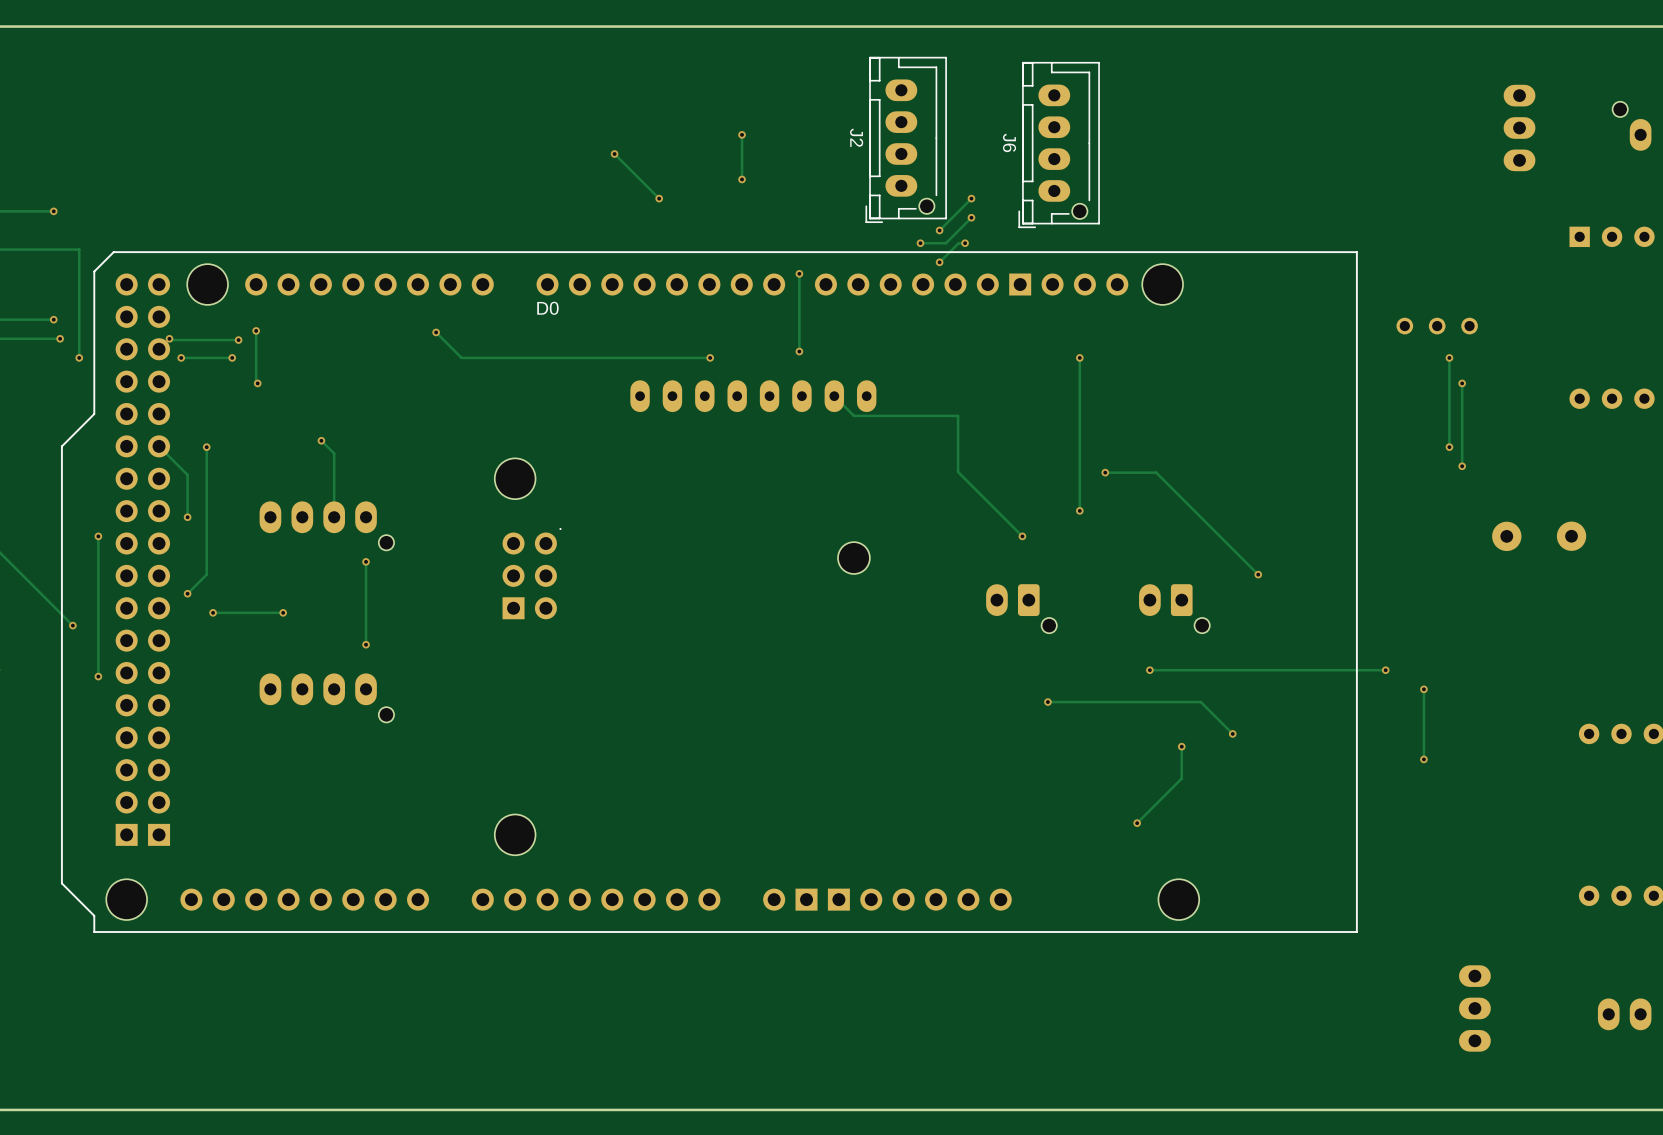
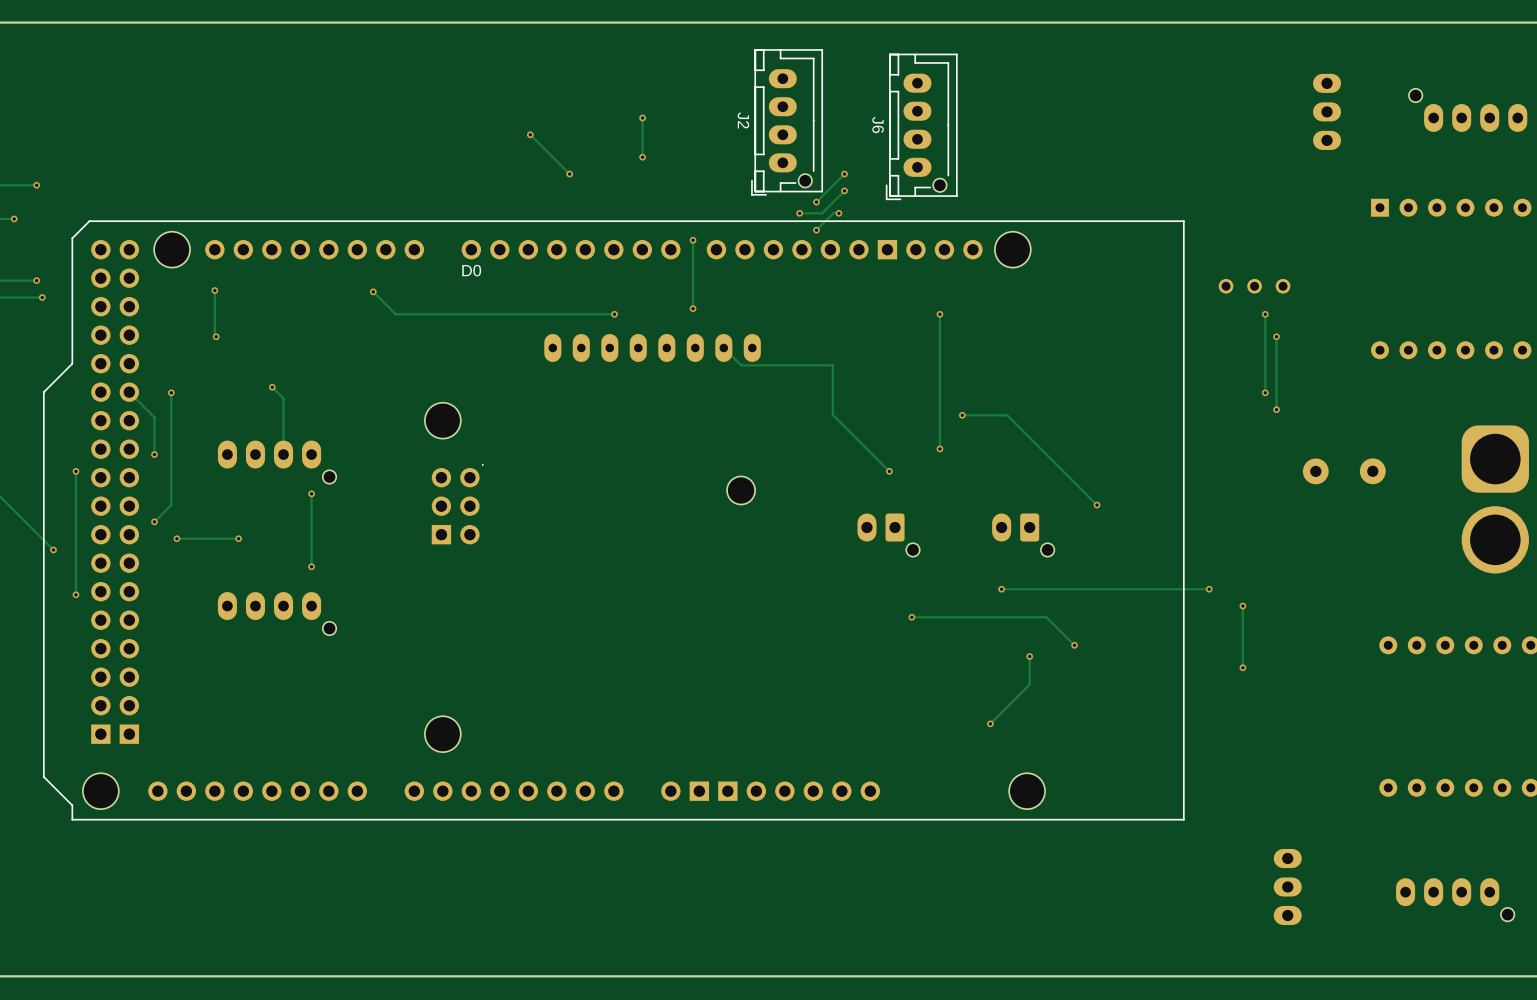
track: (28, 249) (79, 249) (79, 357) -> none
via: none -> (14, 218)
track: (169, 338) (238, 340) -> none
via: (169, 338) -> none
via: (238, 340) -> none
via: (79, 357) -> none
via: (181, 357) -> none
track: (232, 357) (181, 357) -> none
via: (232, 357) -> none

